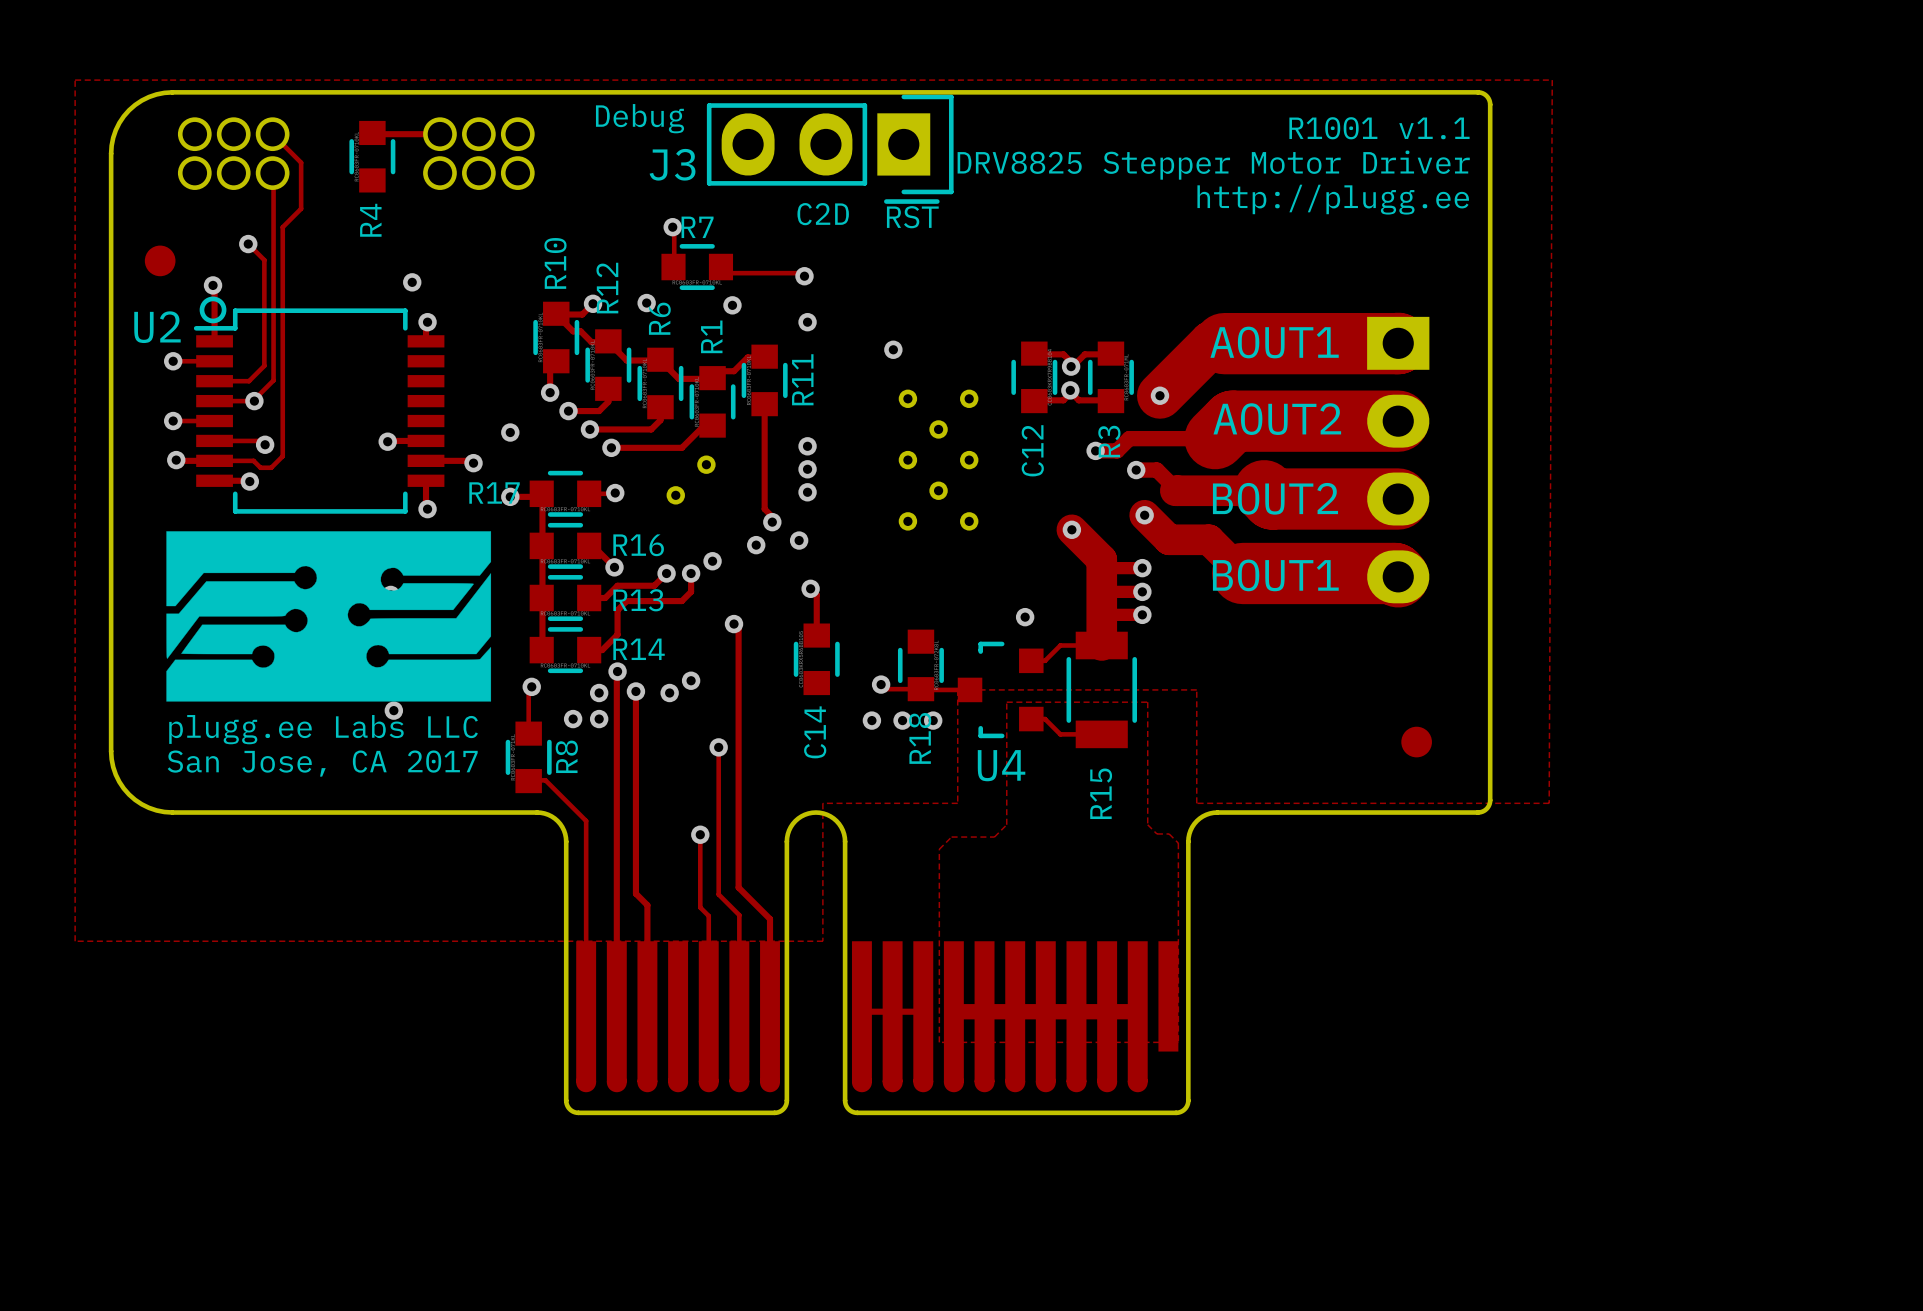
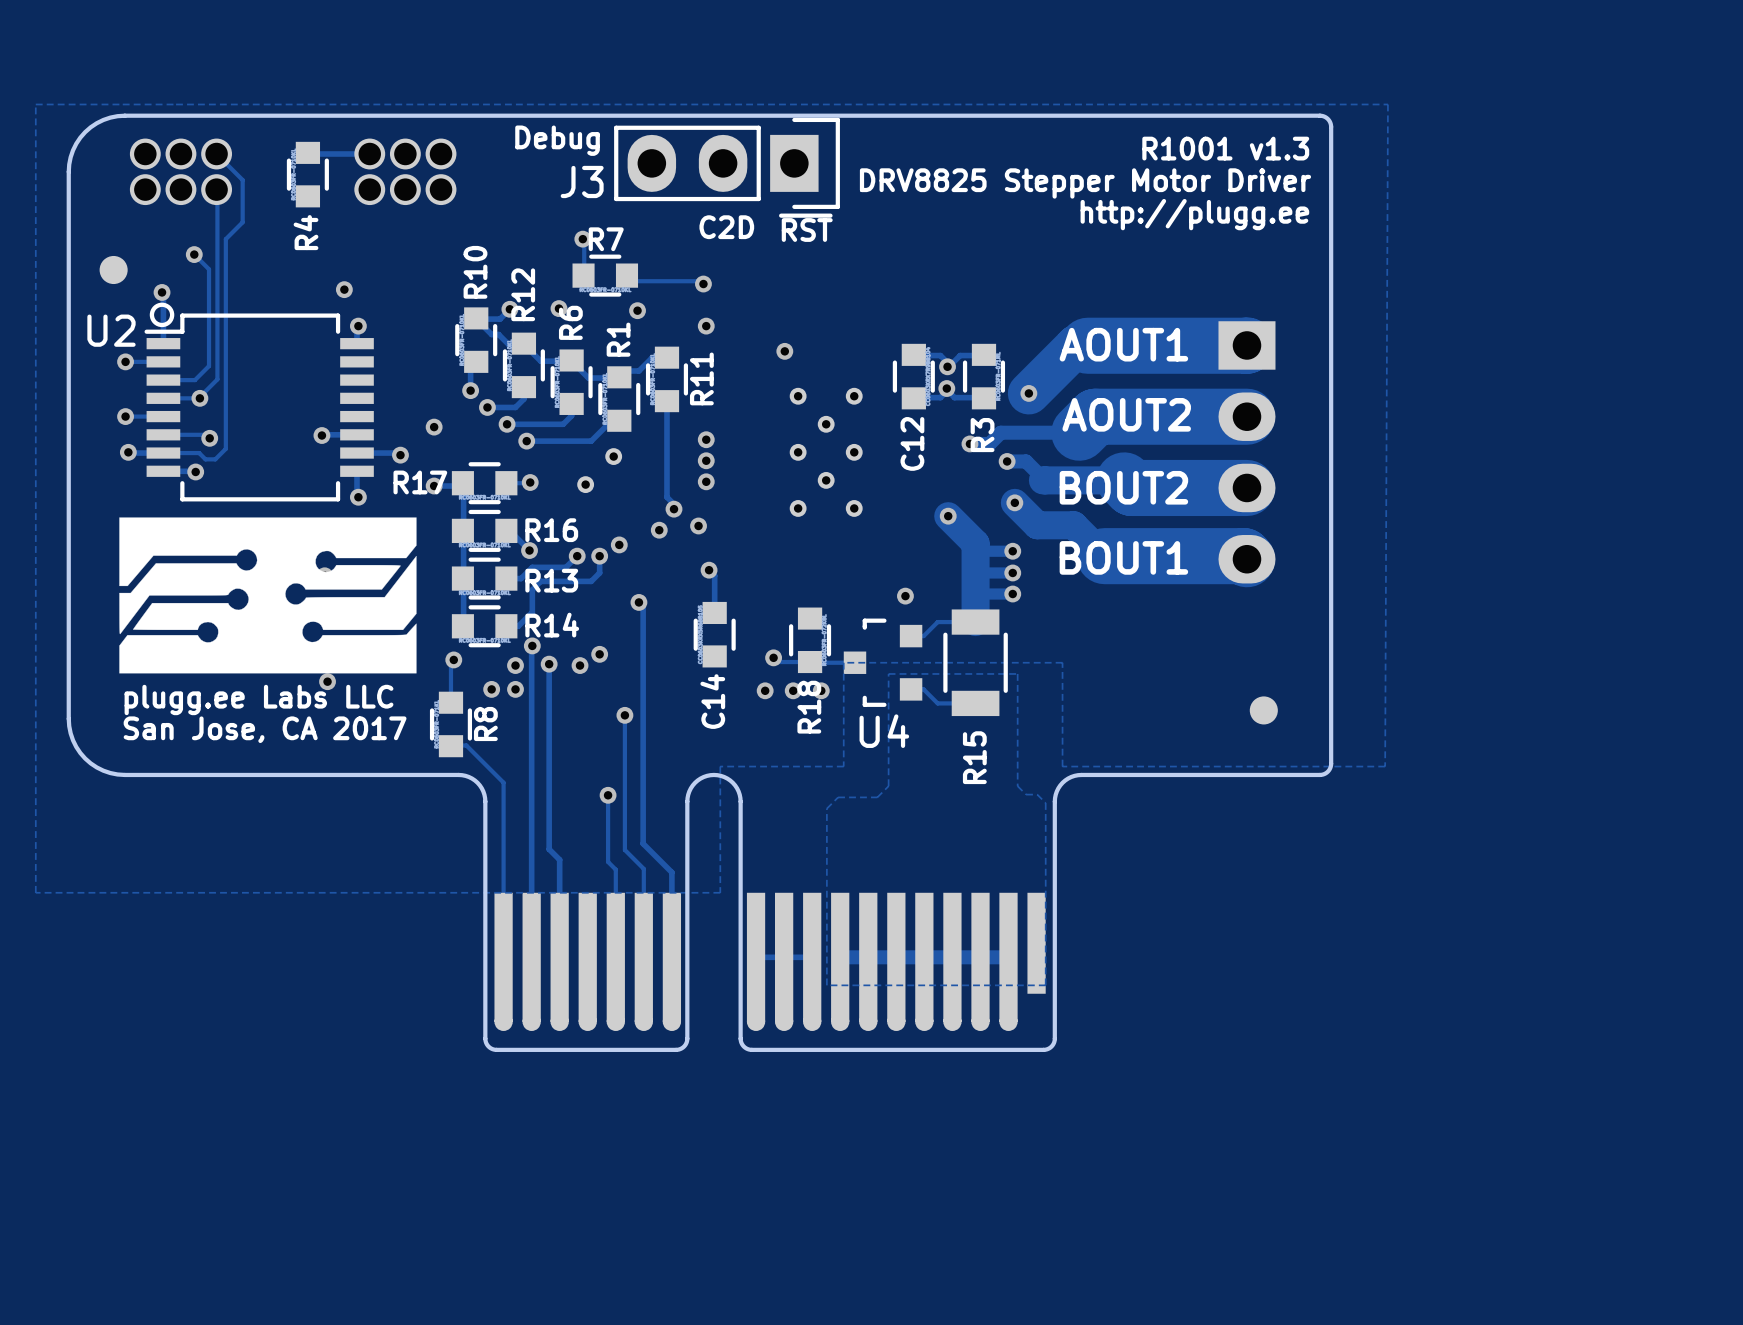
text: R1001 v1.1 (1379, 128) -> R1001 v1.3 (1225, 148)

